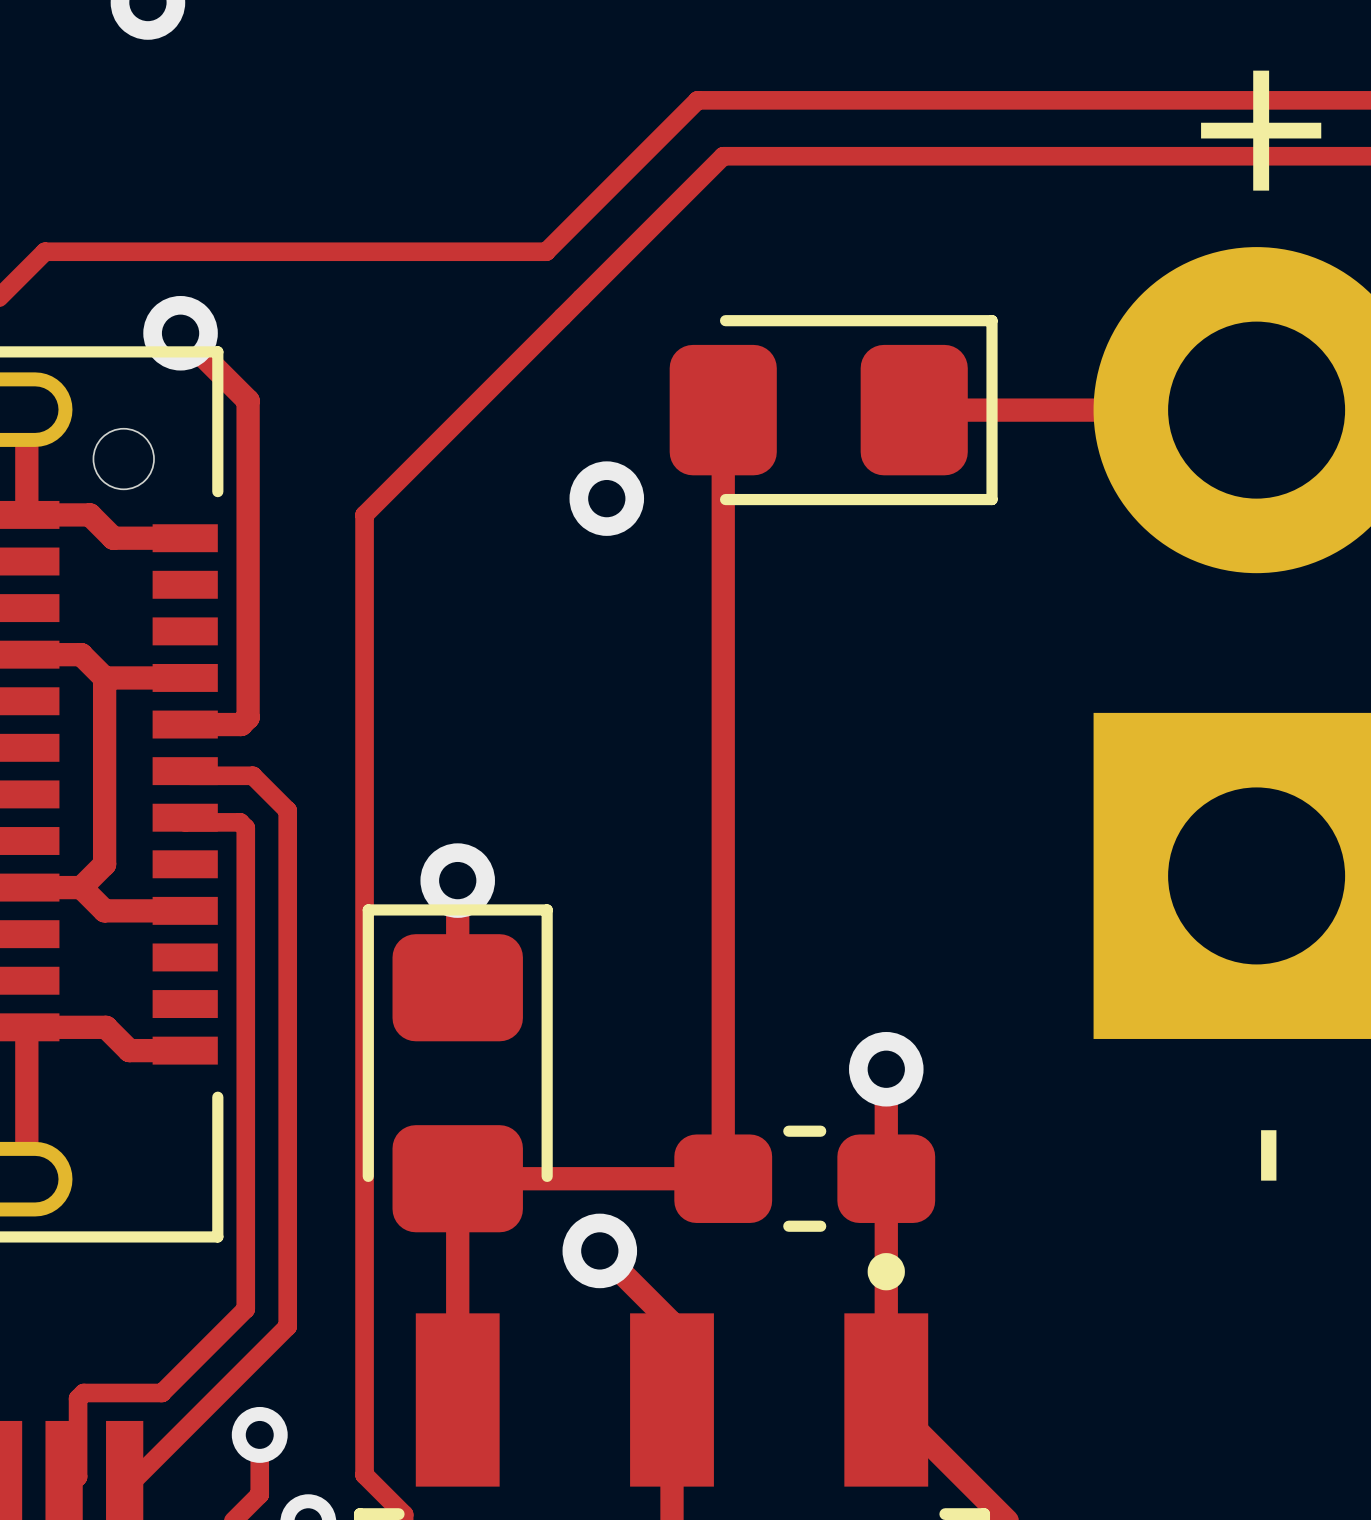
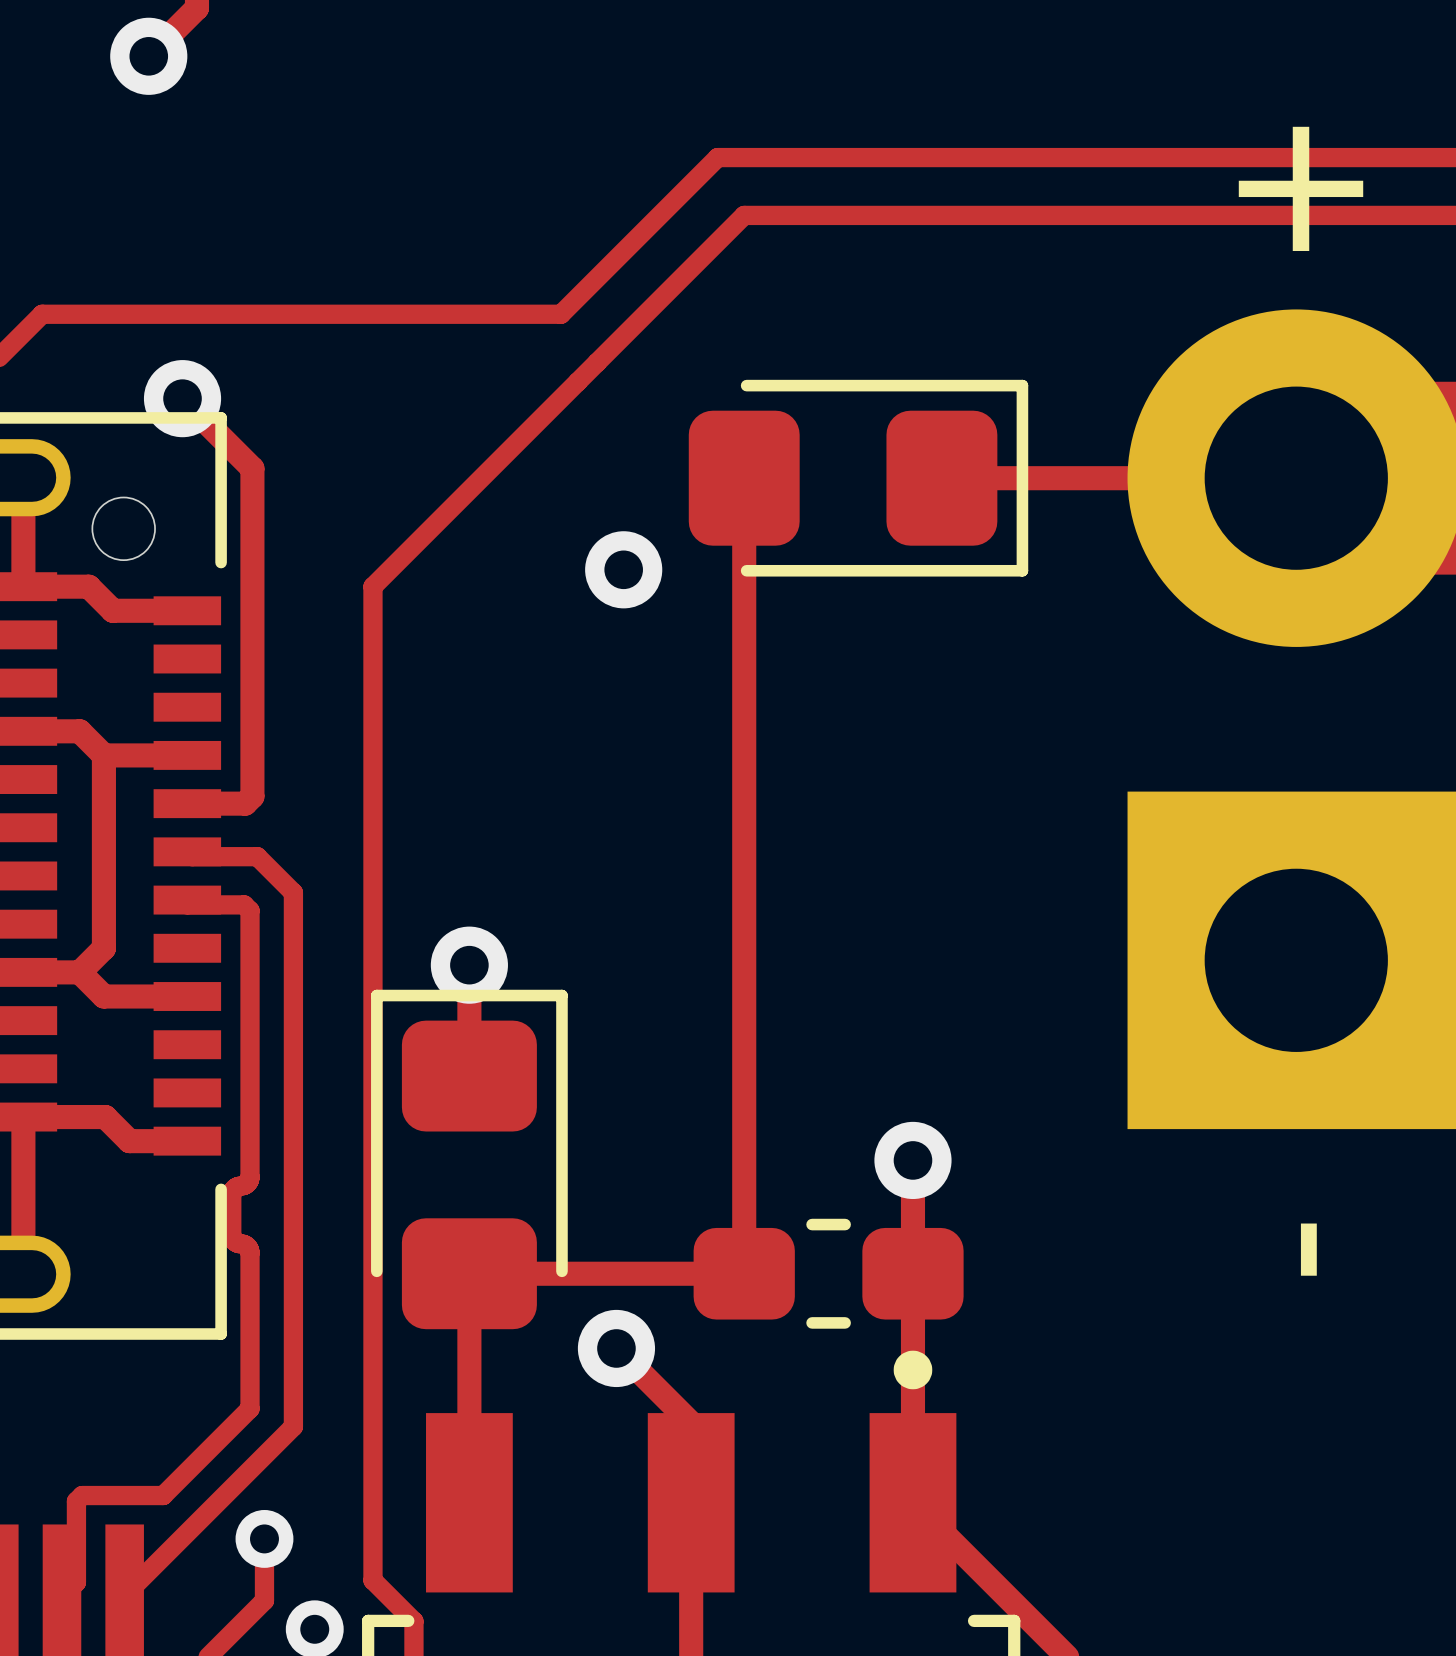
track: (245, 1085) (245, 1158) -> (250, 1176) (246, 1184) (235, 1188) (231, 1195) (231, 1236) (236, 1242) (246, 1245) (250, 1253)

